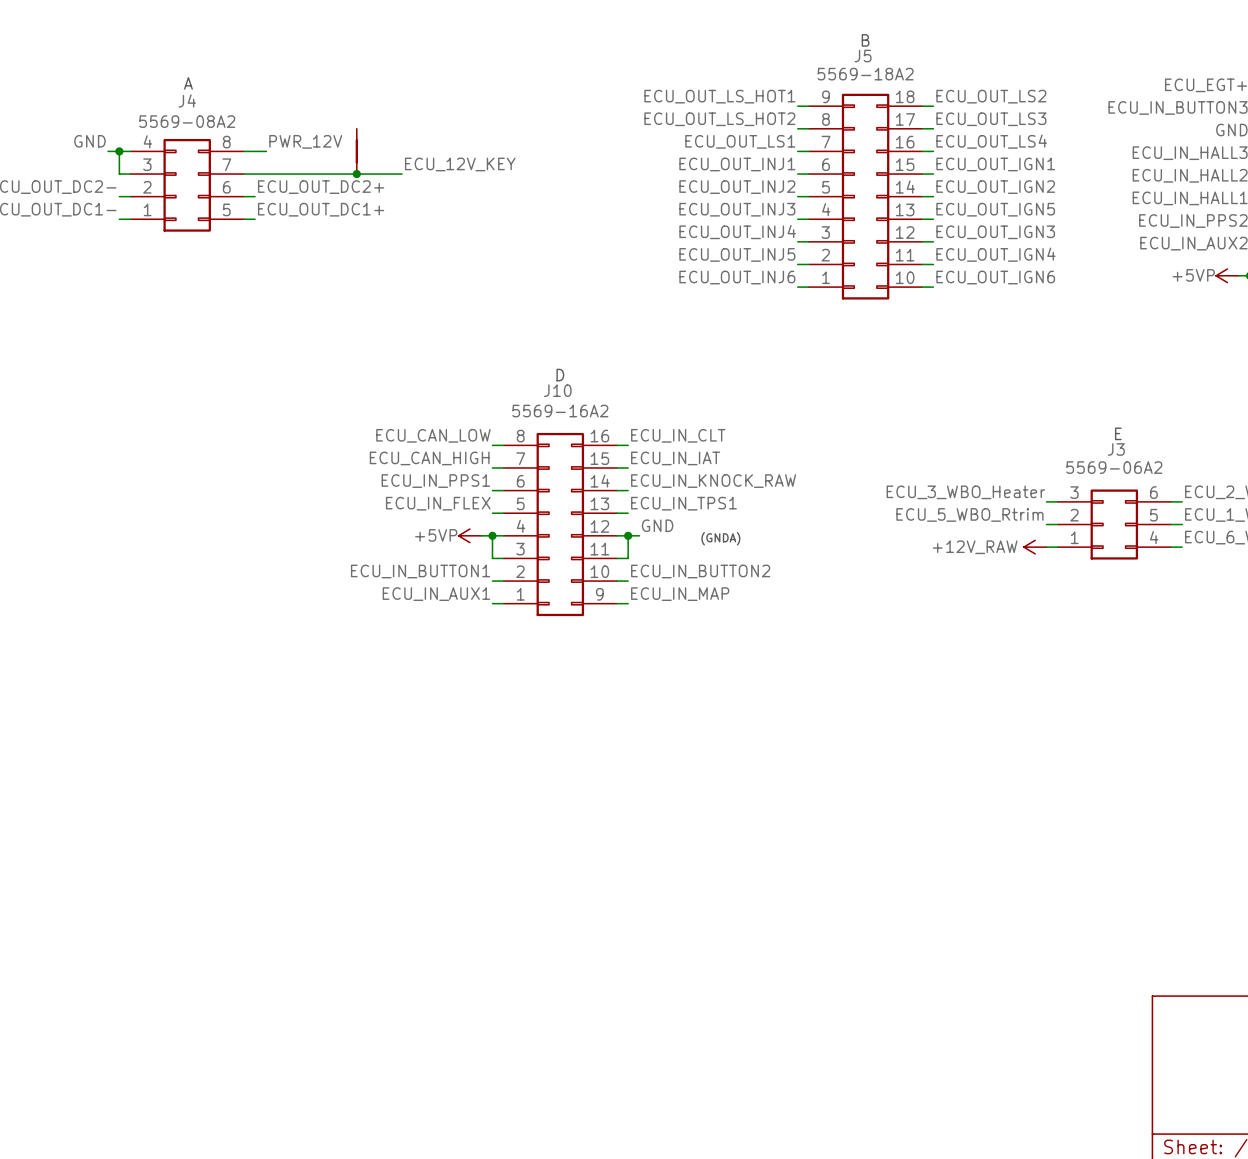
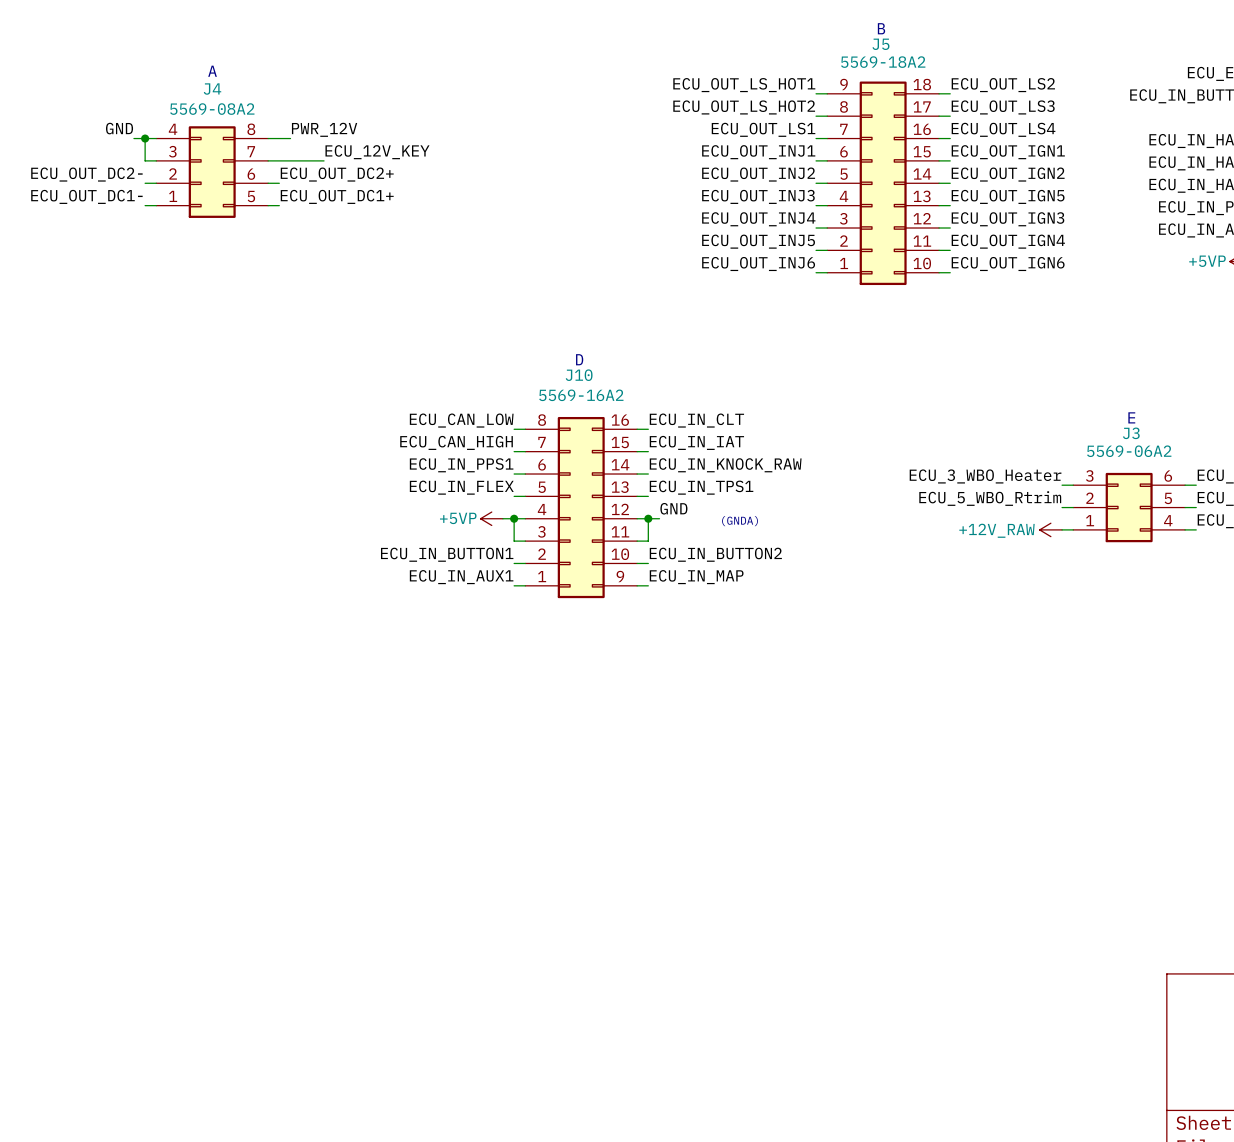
part: (356, 151) -> none
label position: ECU_12V_KEY (460, 164) -> ECU_12V_KEY (377, 152)
wire: (300, 174) (402, 174) -> none
junction: (356, 174) -> none

